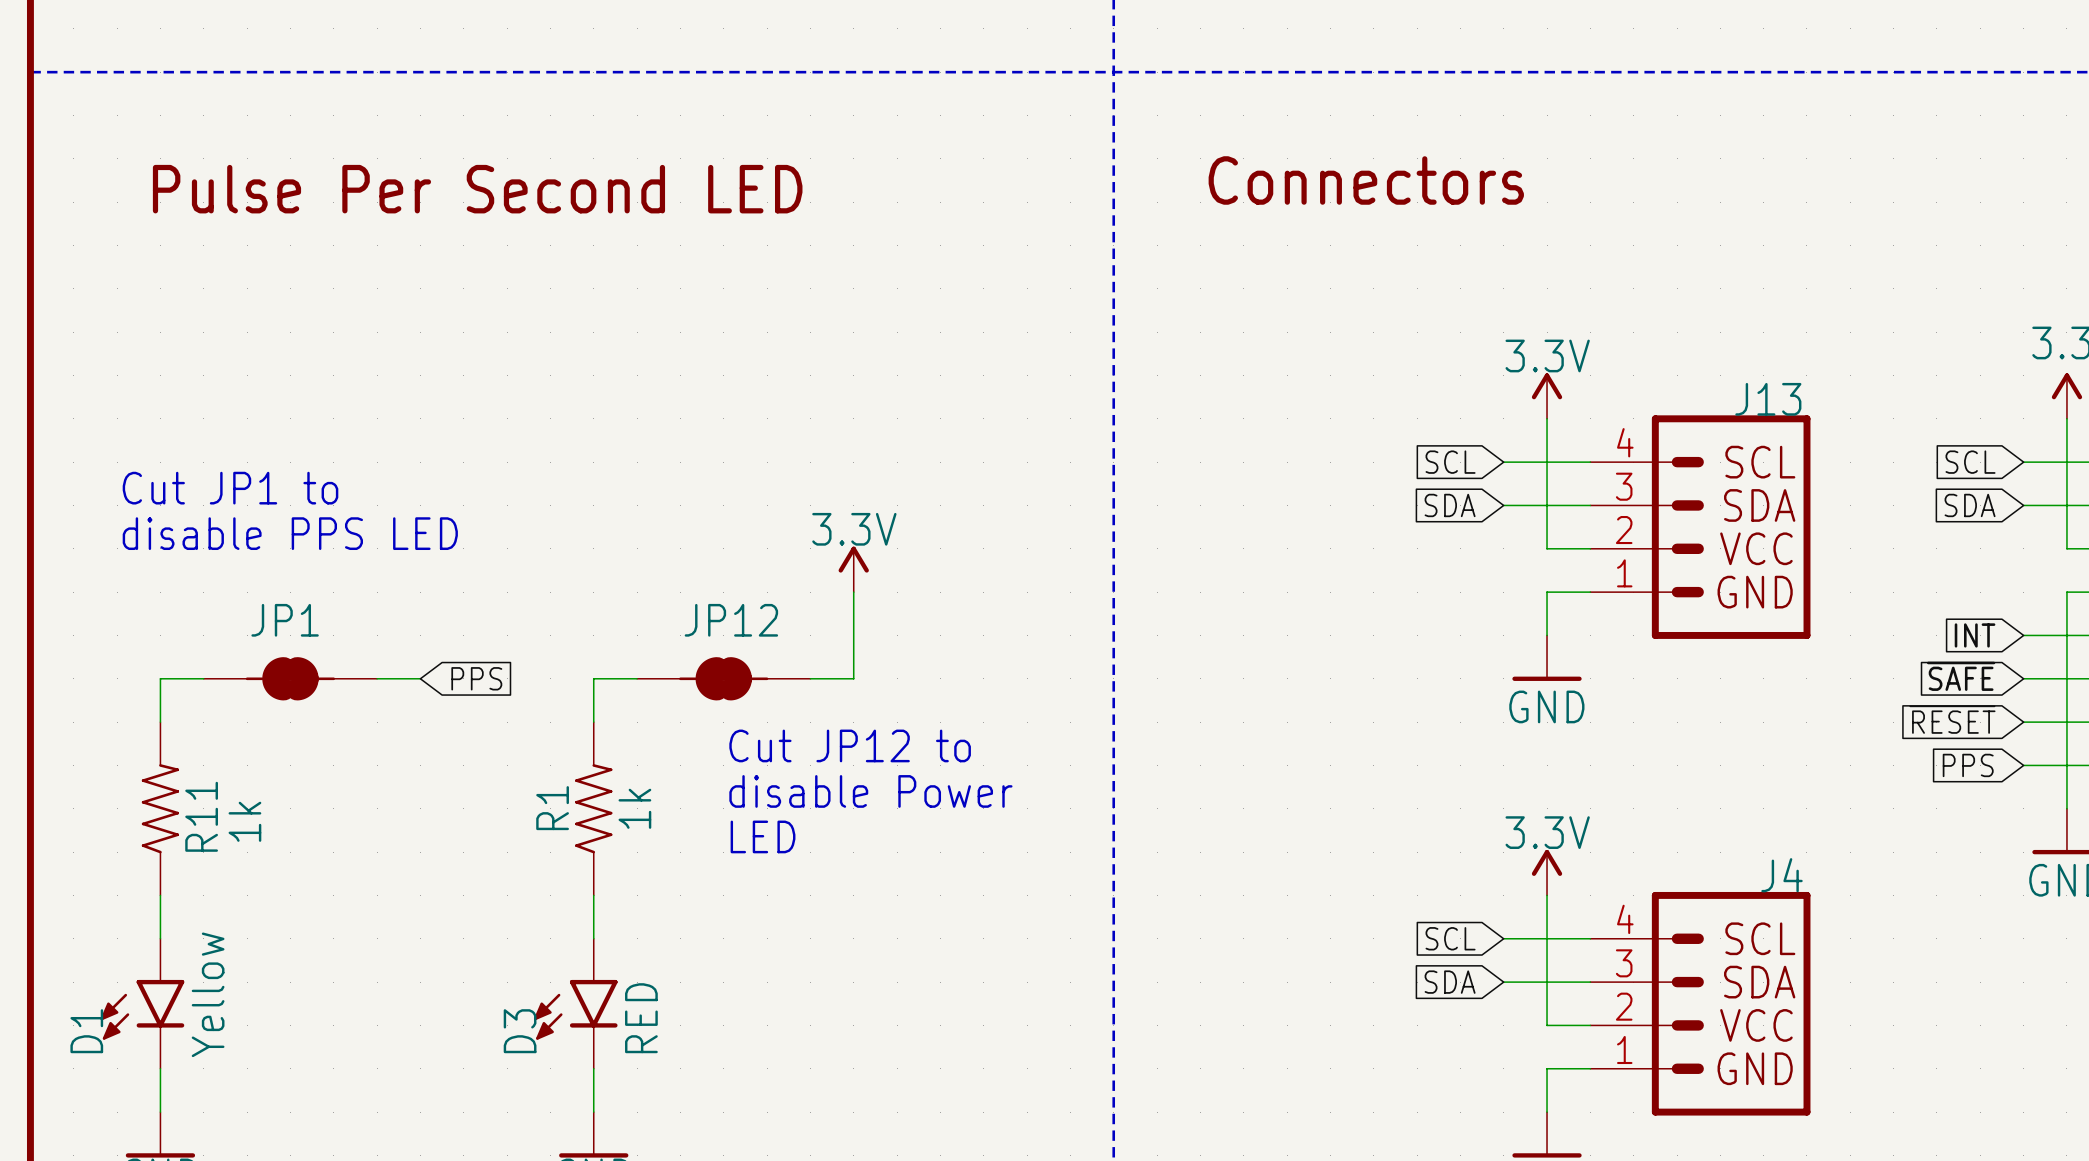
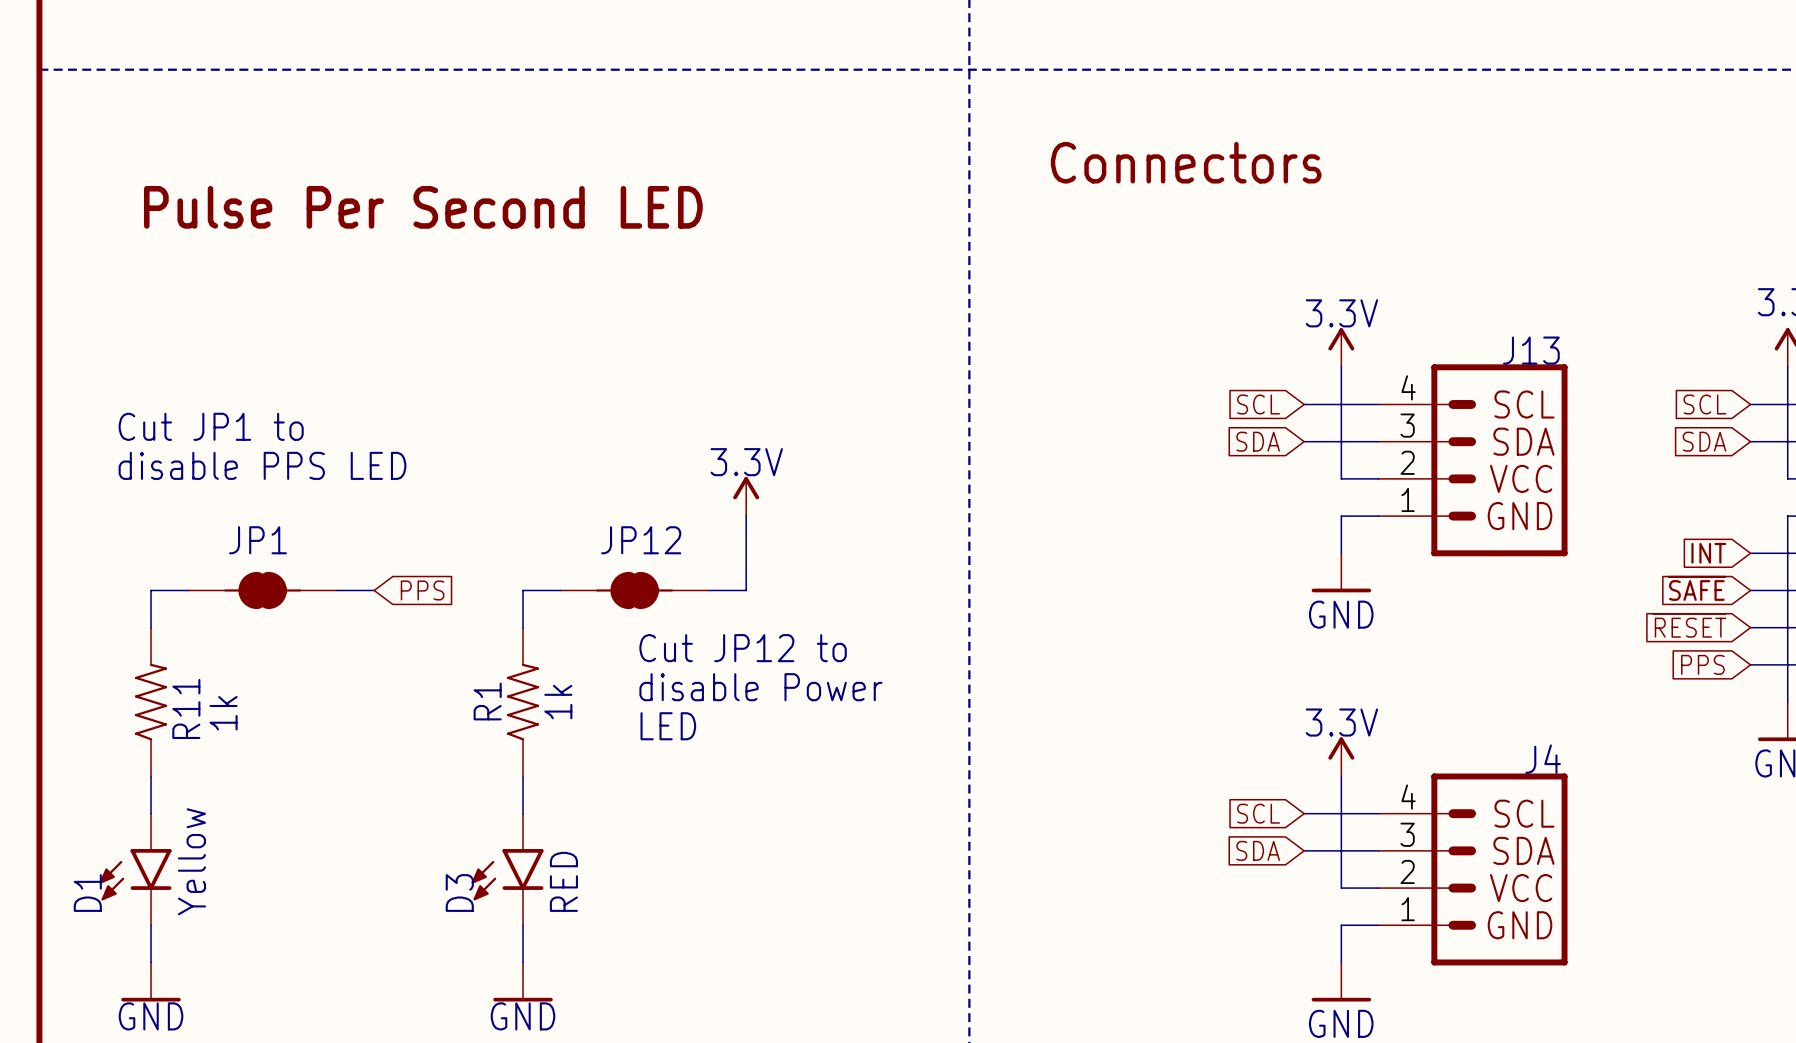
text position: Pulse Per Second LED (477, 189) -> Pulse Per Second LED (423, 207)

